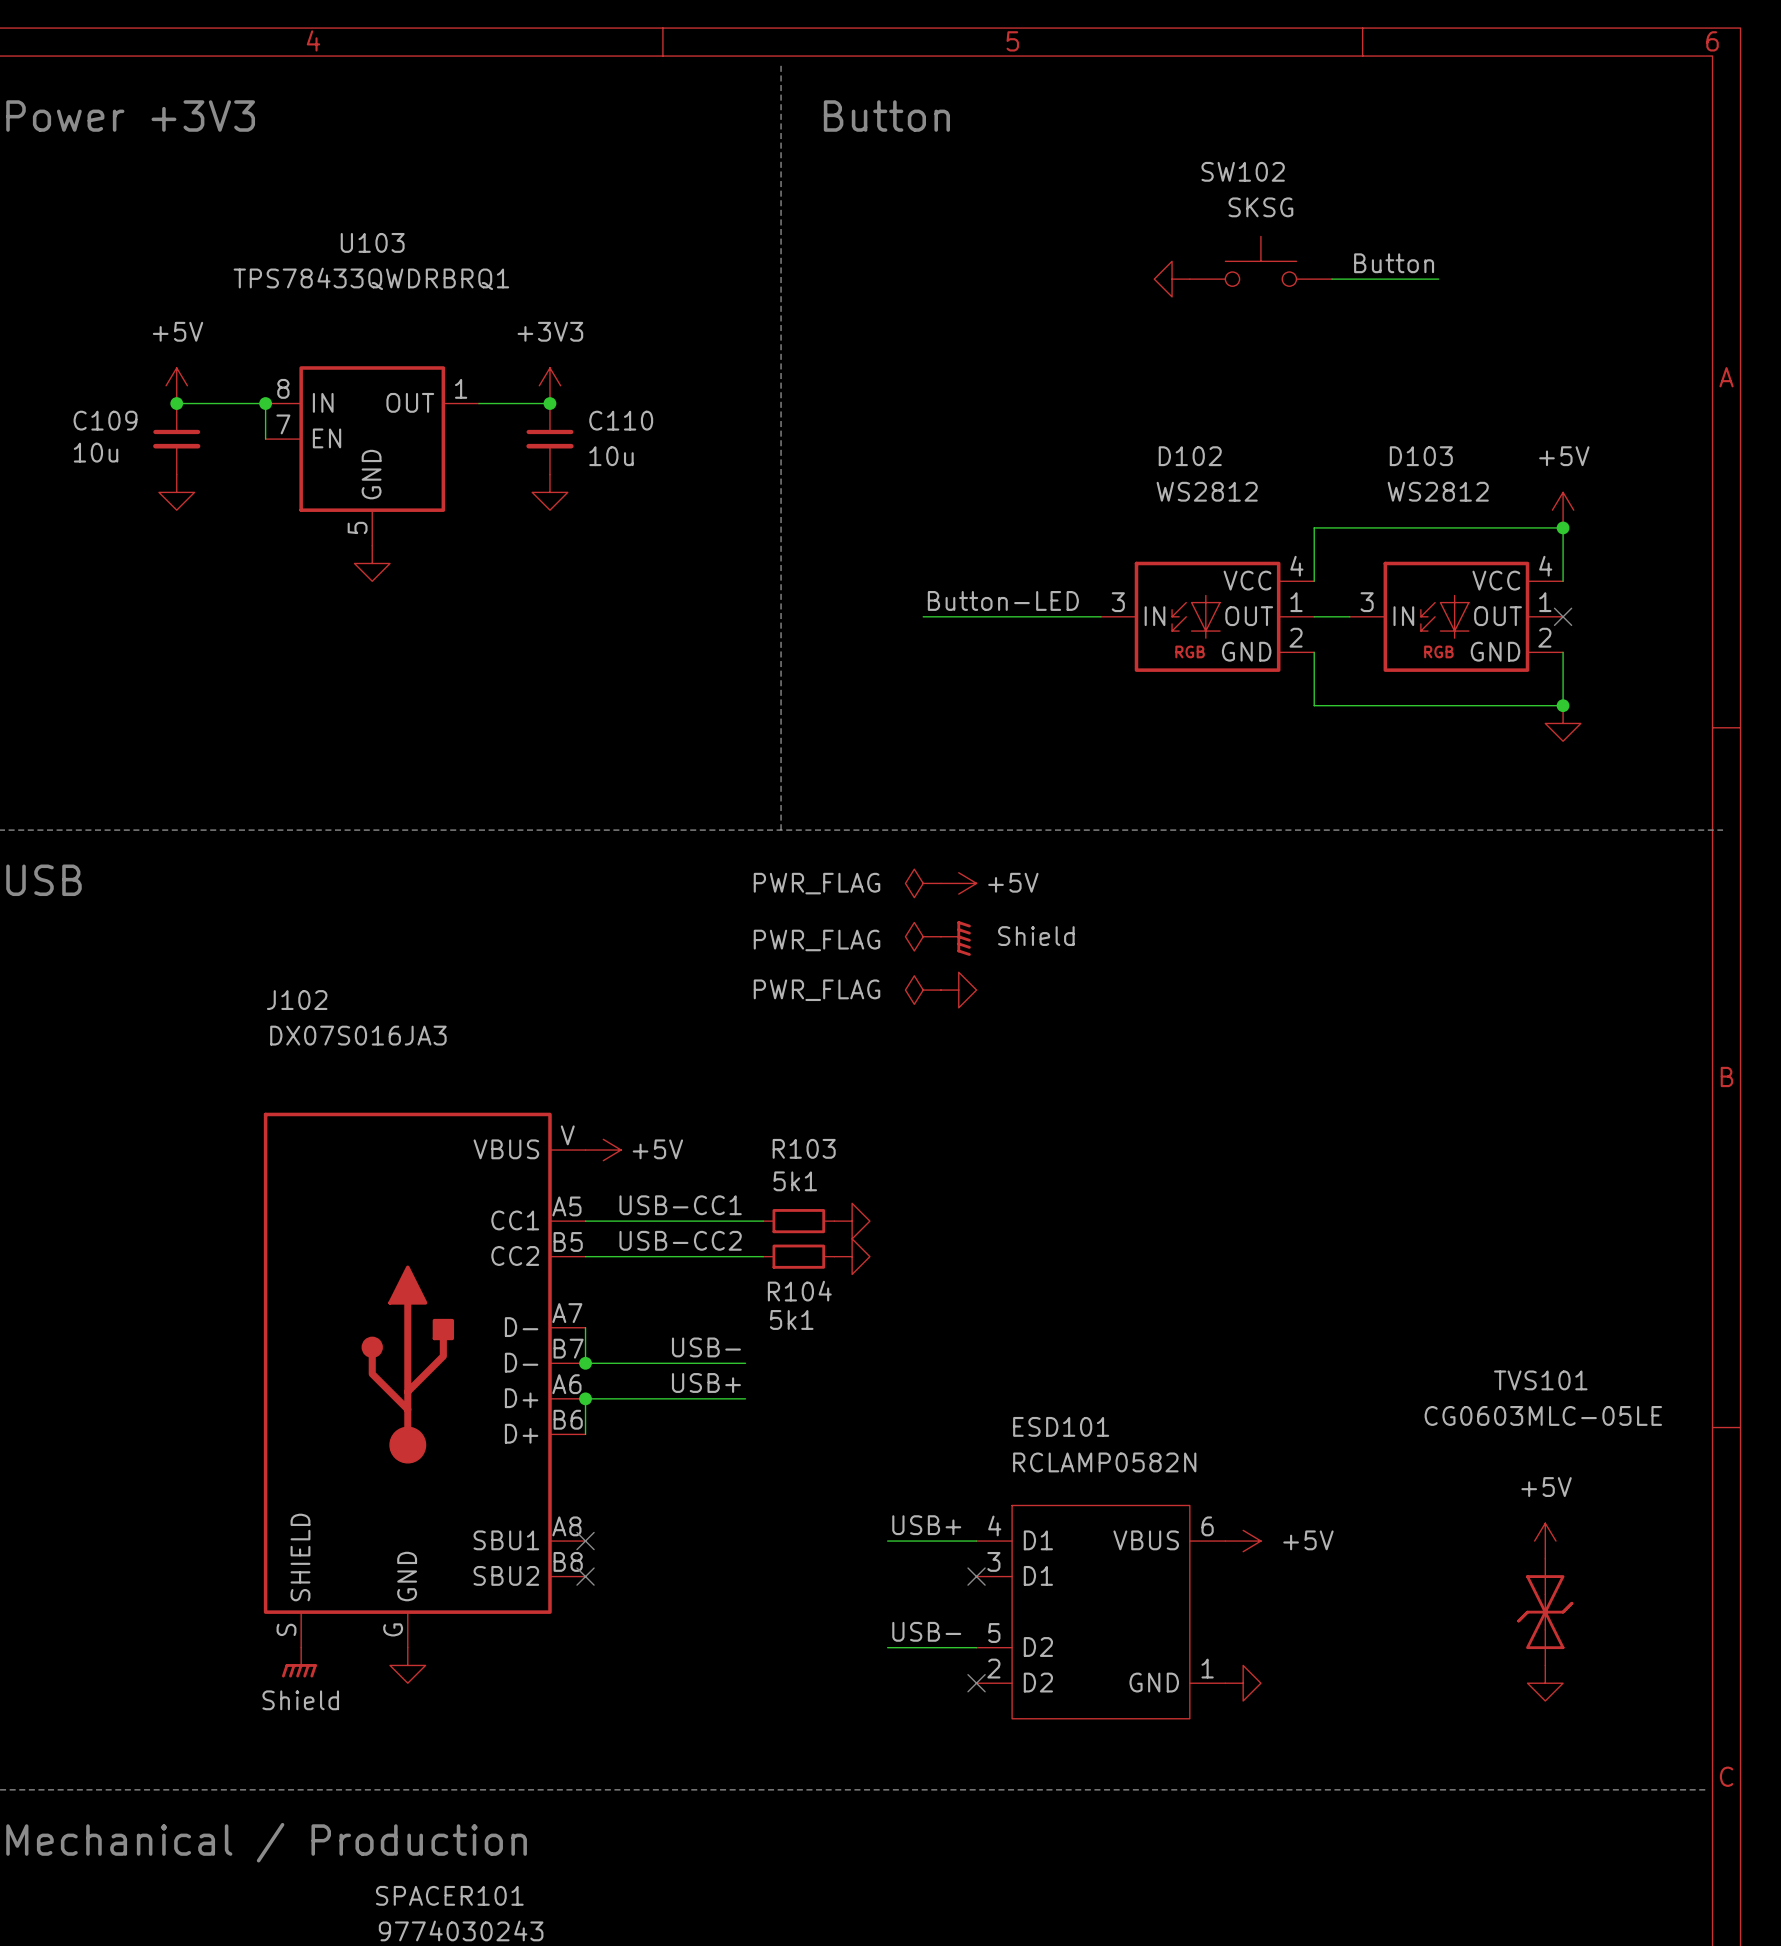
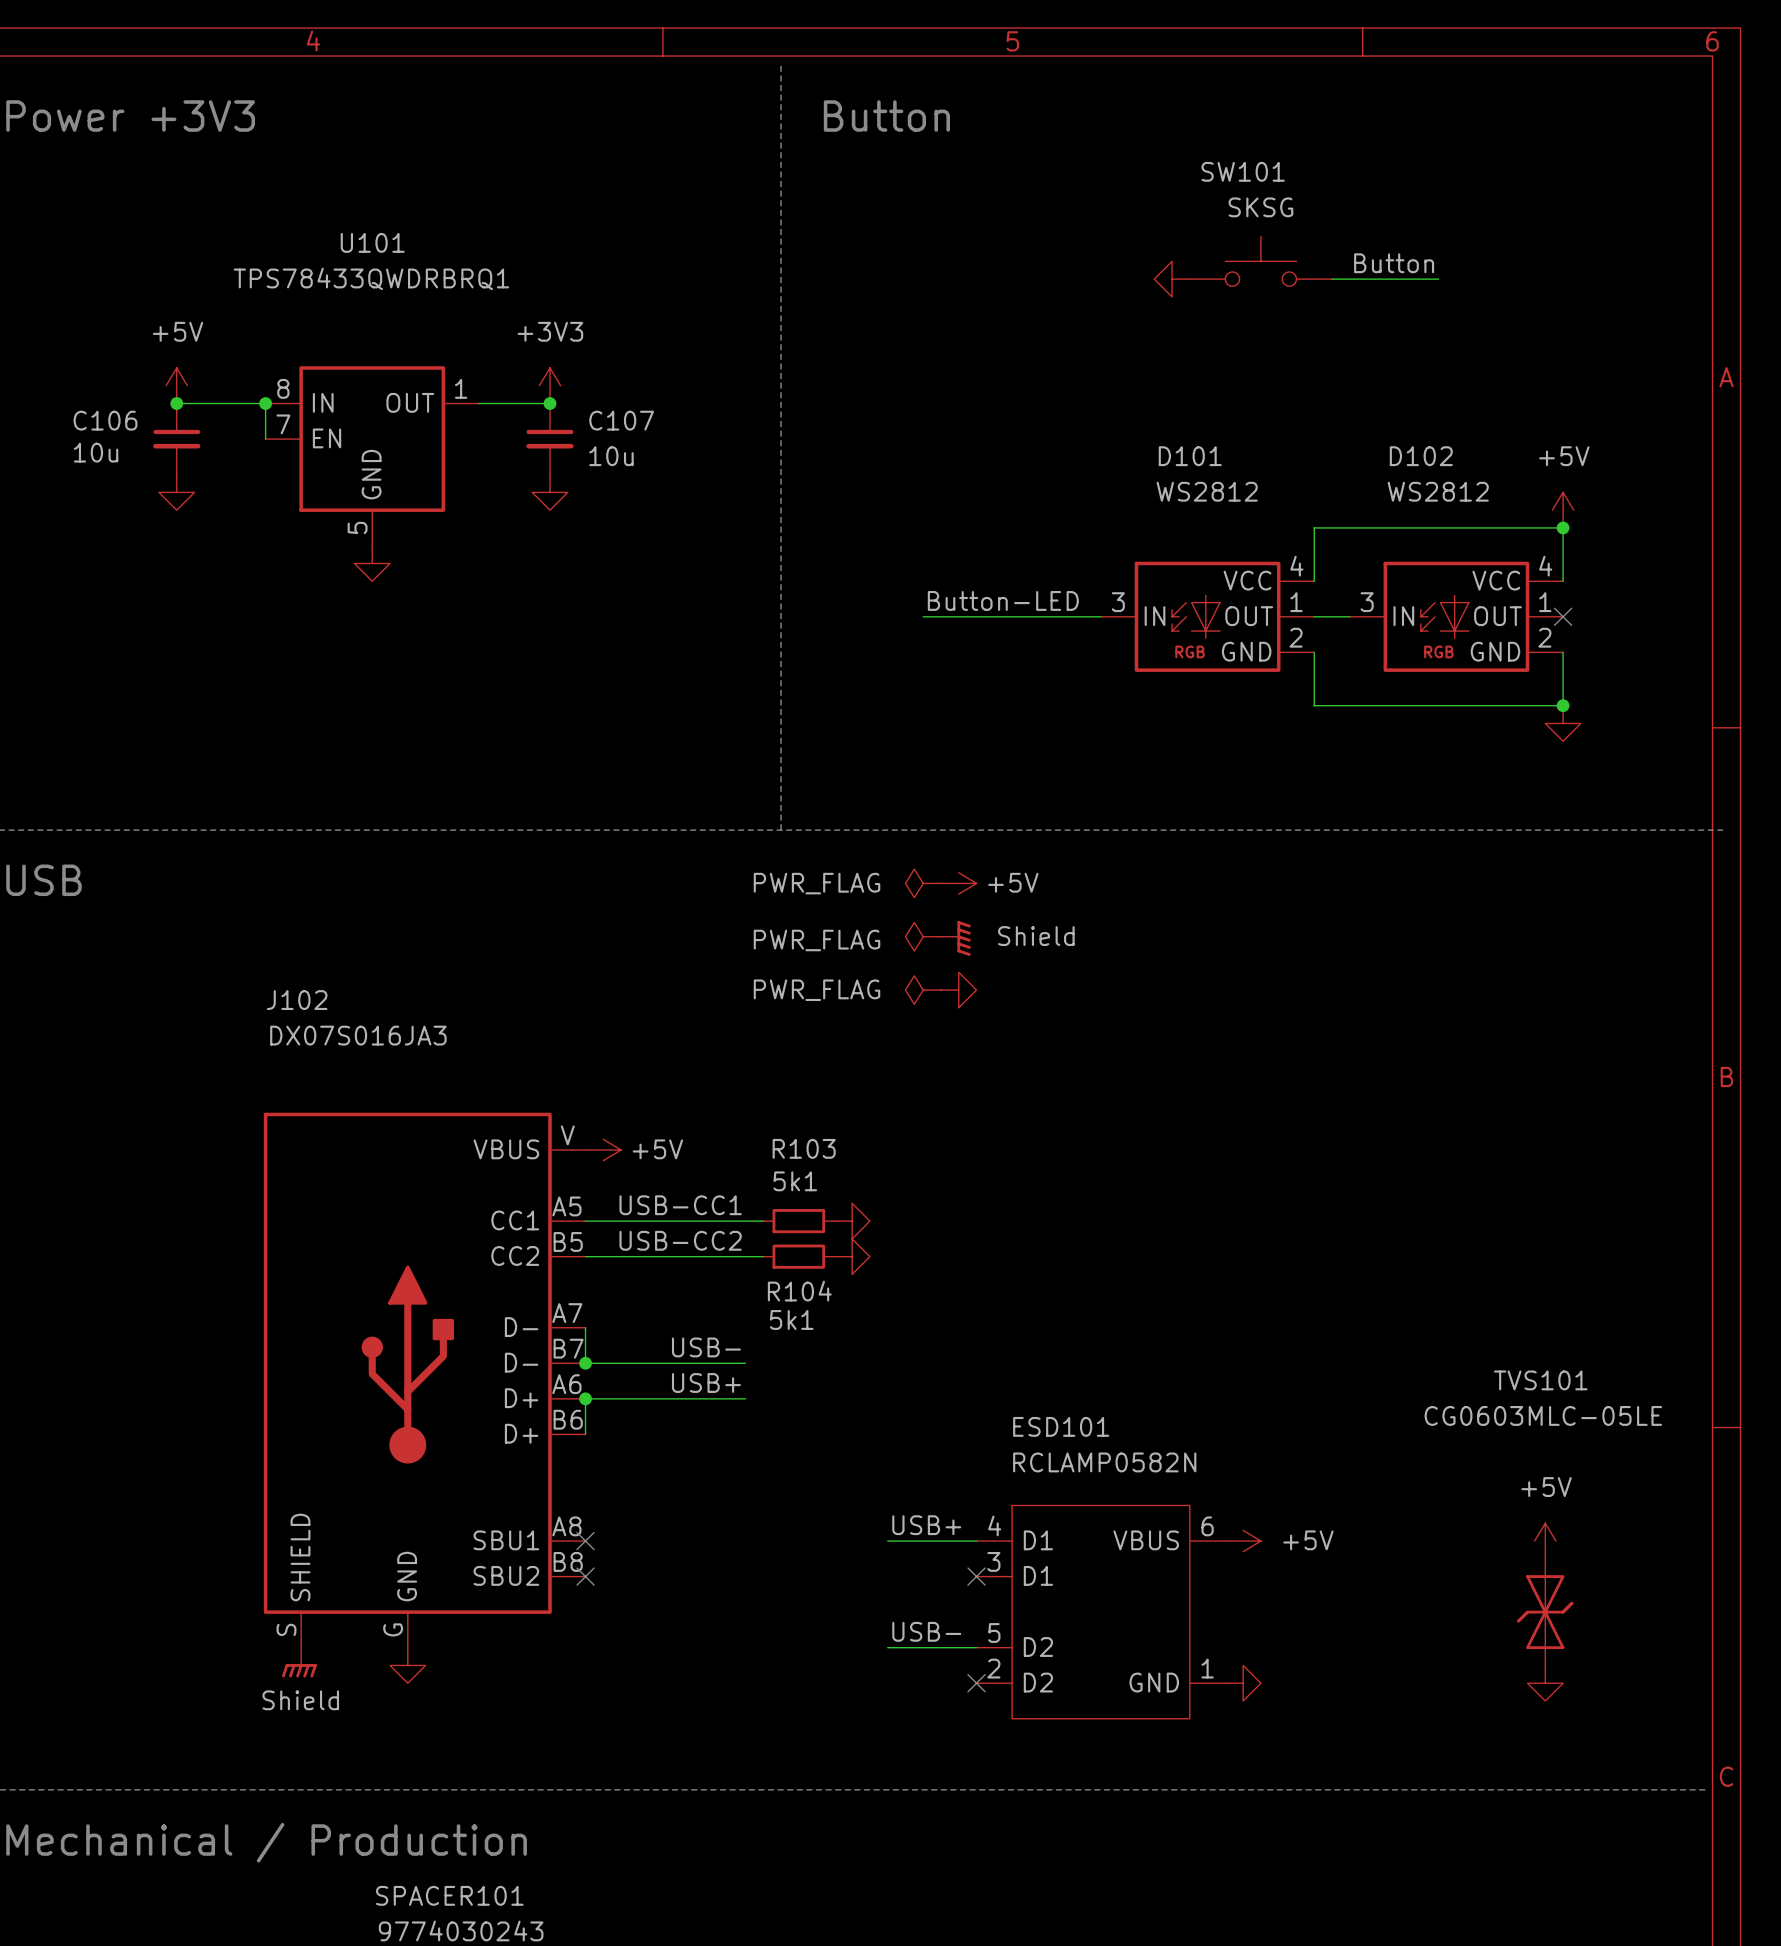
SW102 name: SW102 (1243, 171) -> SW101 (1243, 171)
U103 name: U103 (372, 242) -> U101 (372, 242)
C109 name: C109 (105, 420) -> C106 (105, 420)
C110 name: C110 (621, 420) -> C107 (621, 420)
D102 name: D102 (1190, 456) -> D101 (1190, 456)
D103 name: D103 (1421, 456) -> D102 (1421, 456)

